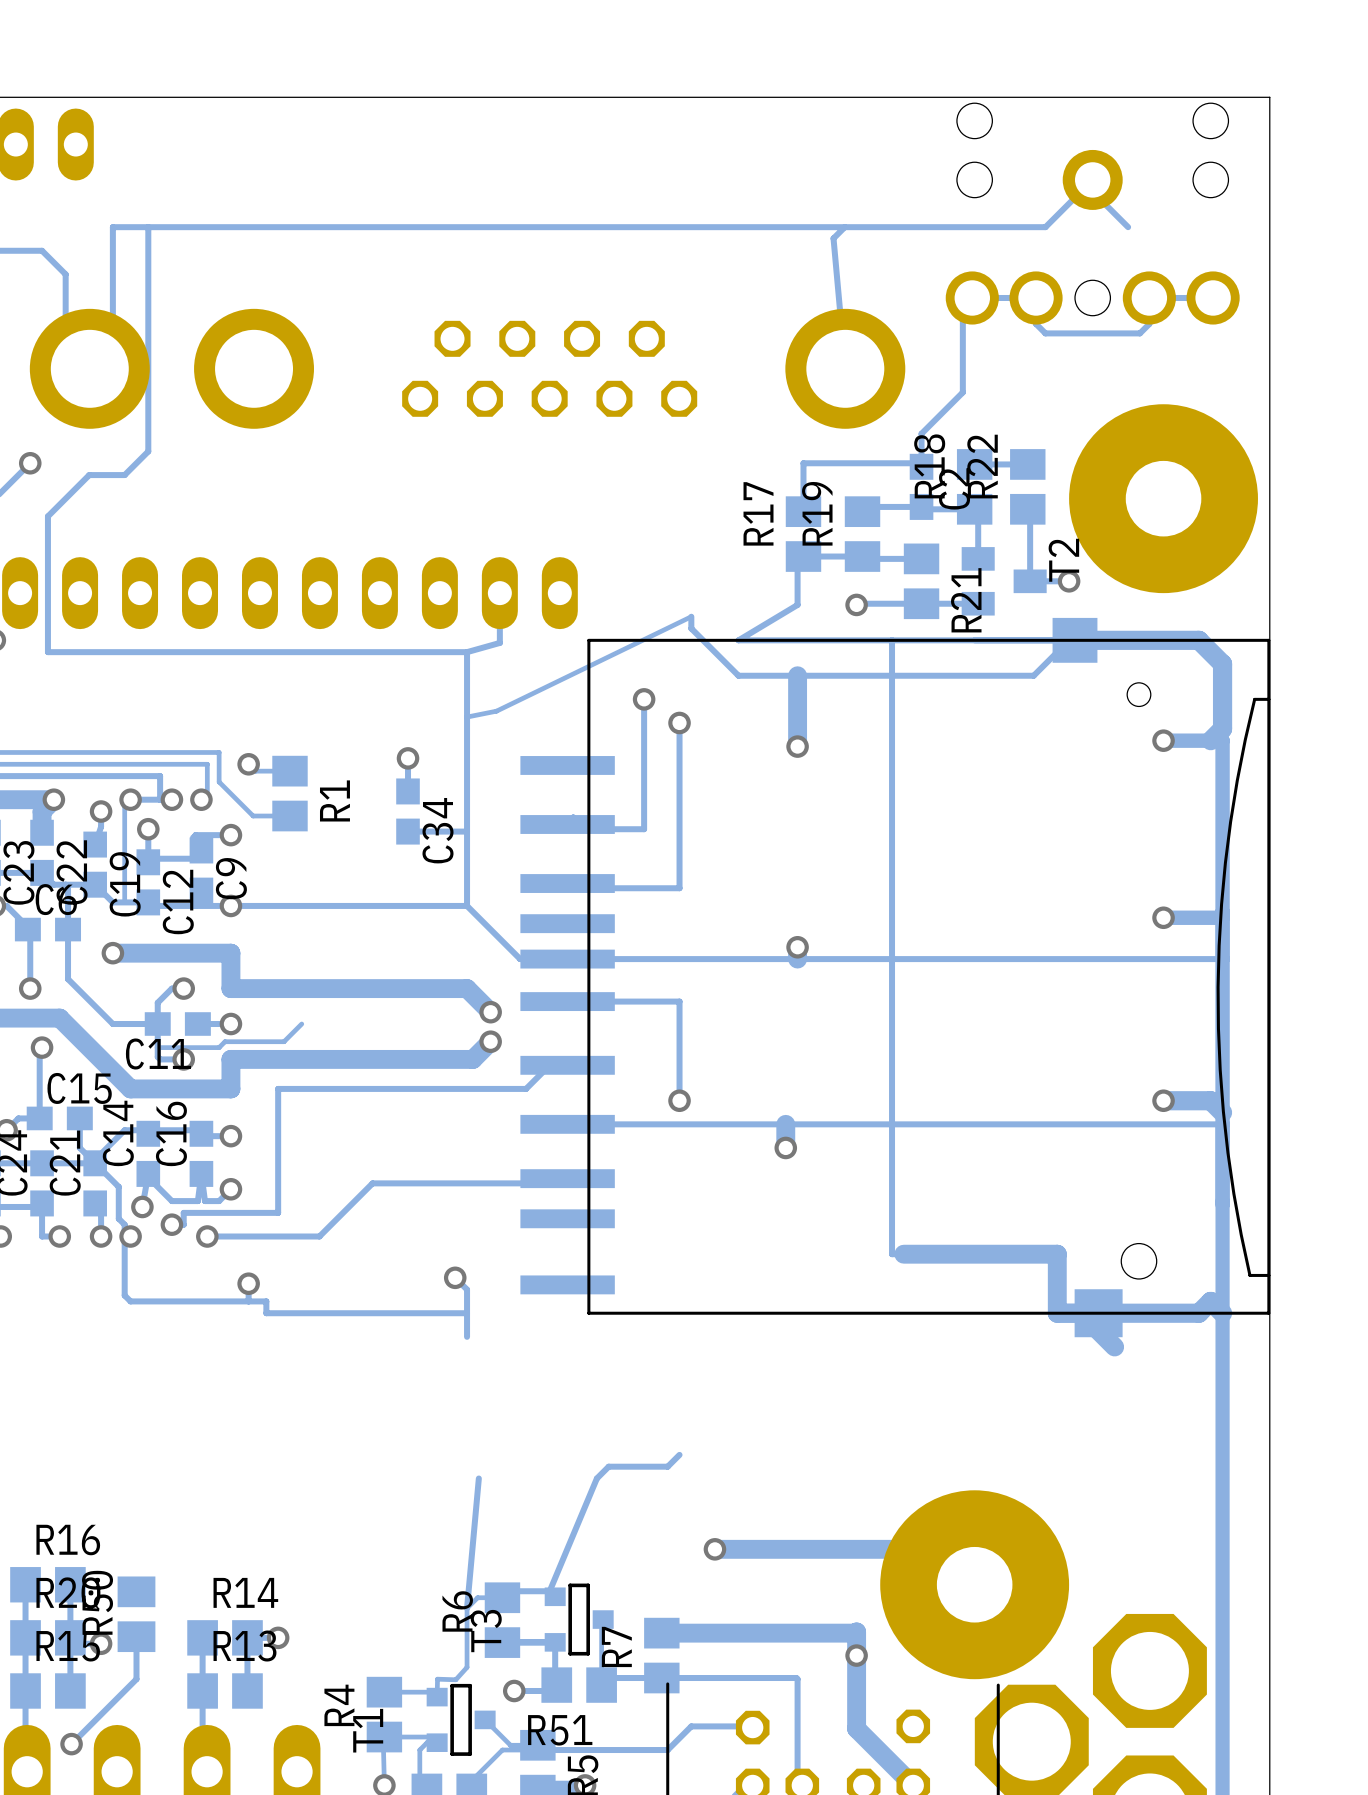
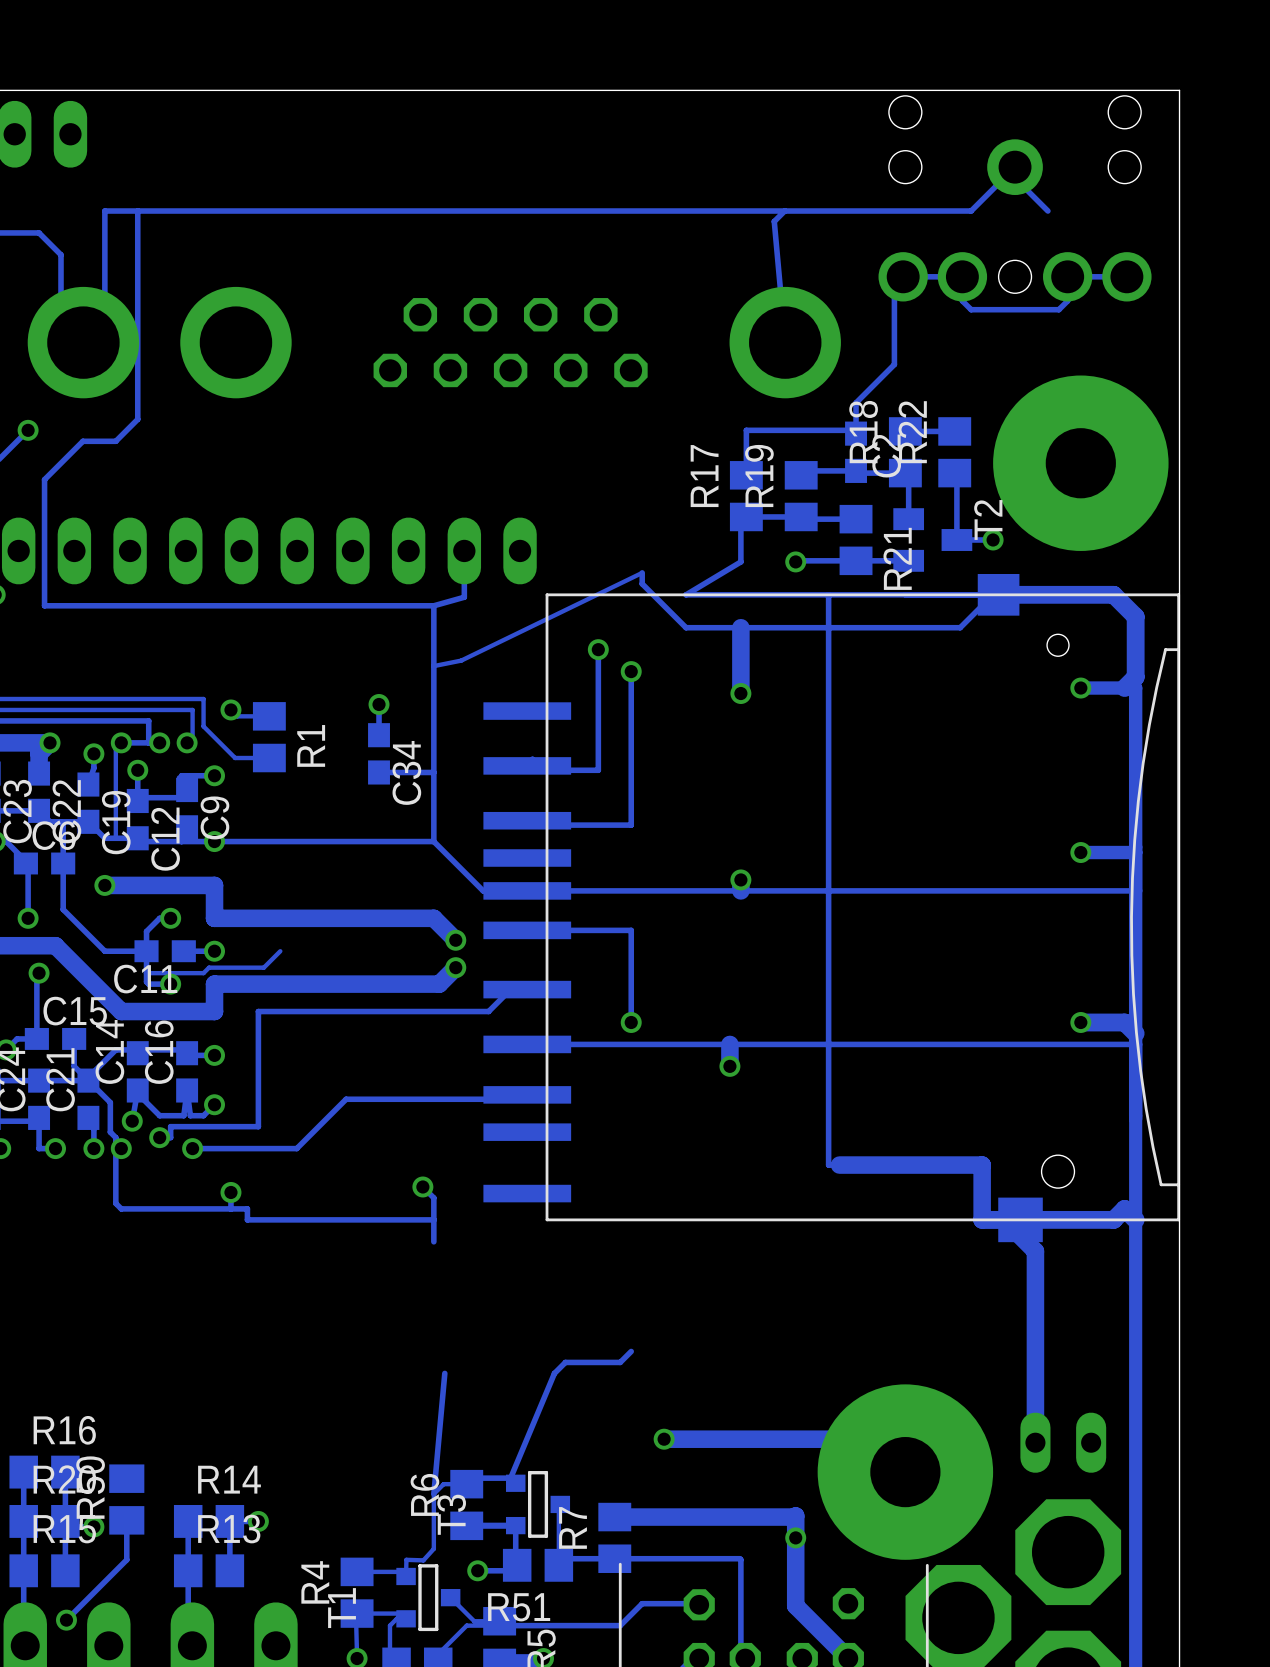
track: none -> (1035, 1251) (1035, 1442)
part: none -> (1063, 1442)

